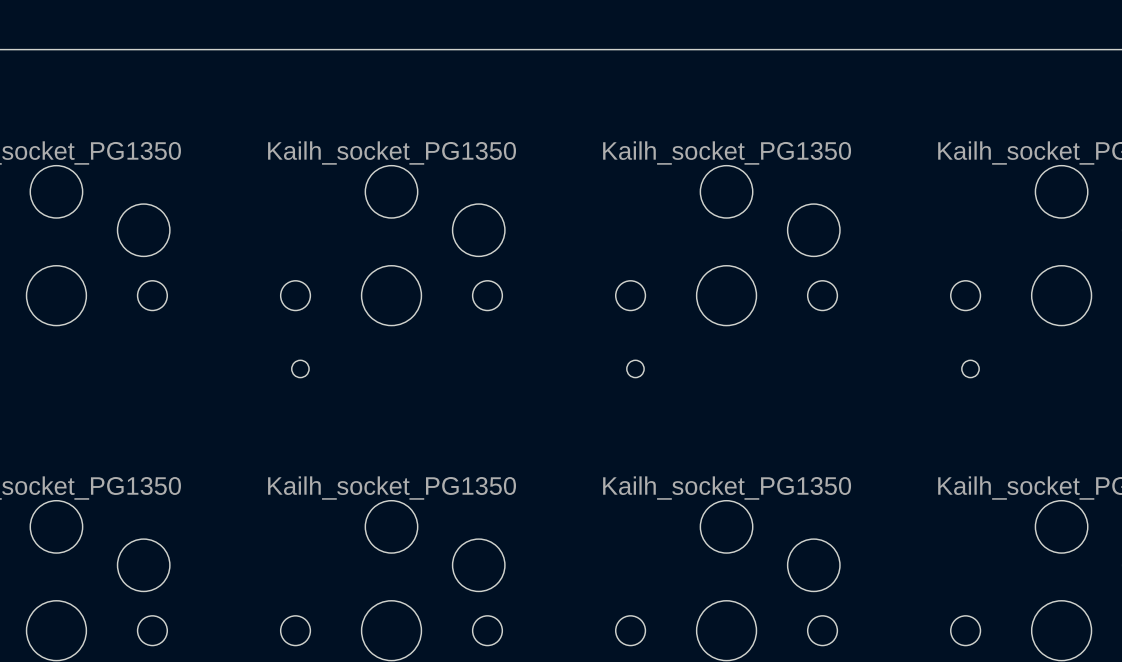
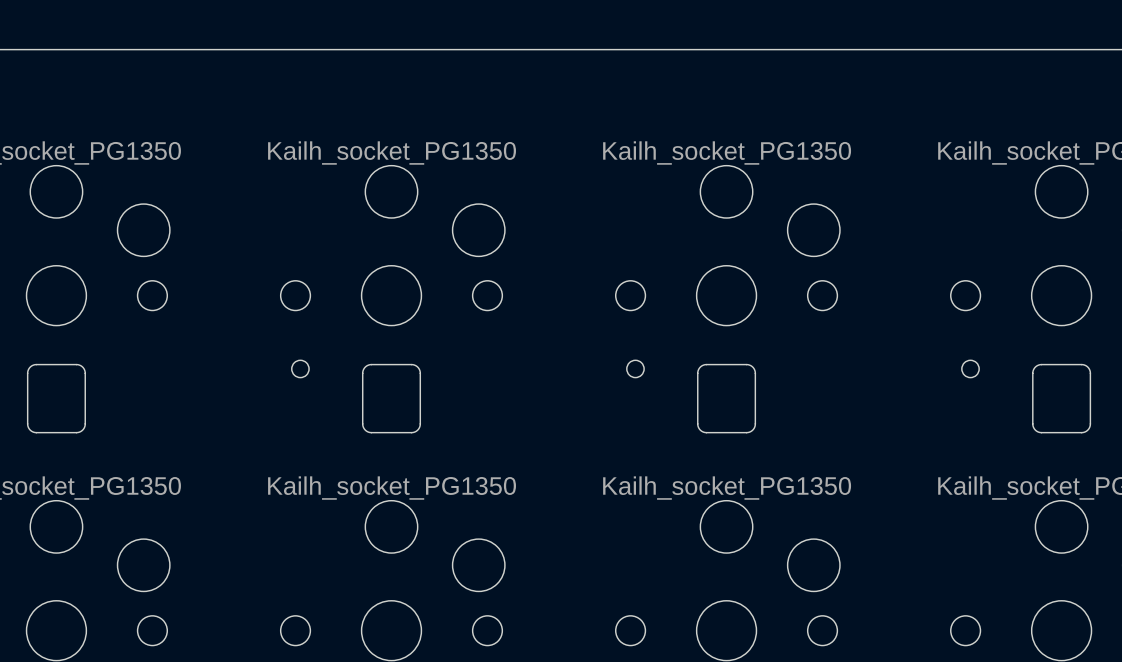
part: none -> (56, 398)
part: none -> (391, 398)
part: none -> (726, 398)
part: none -> (1061, 398)

